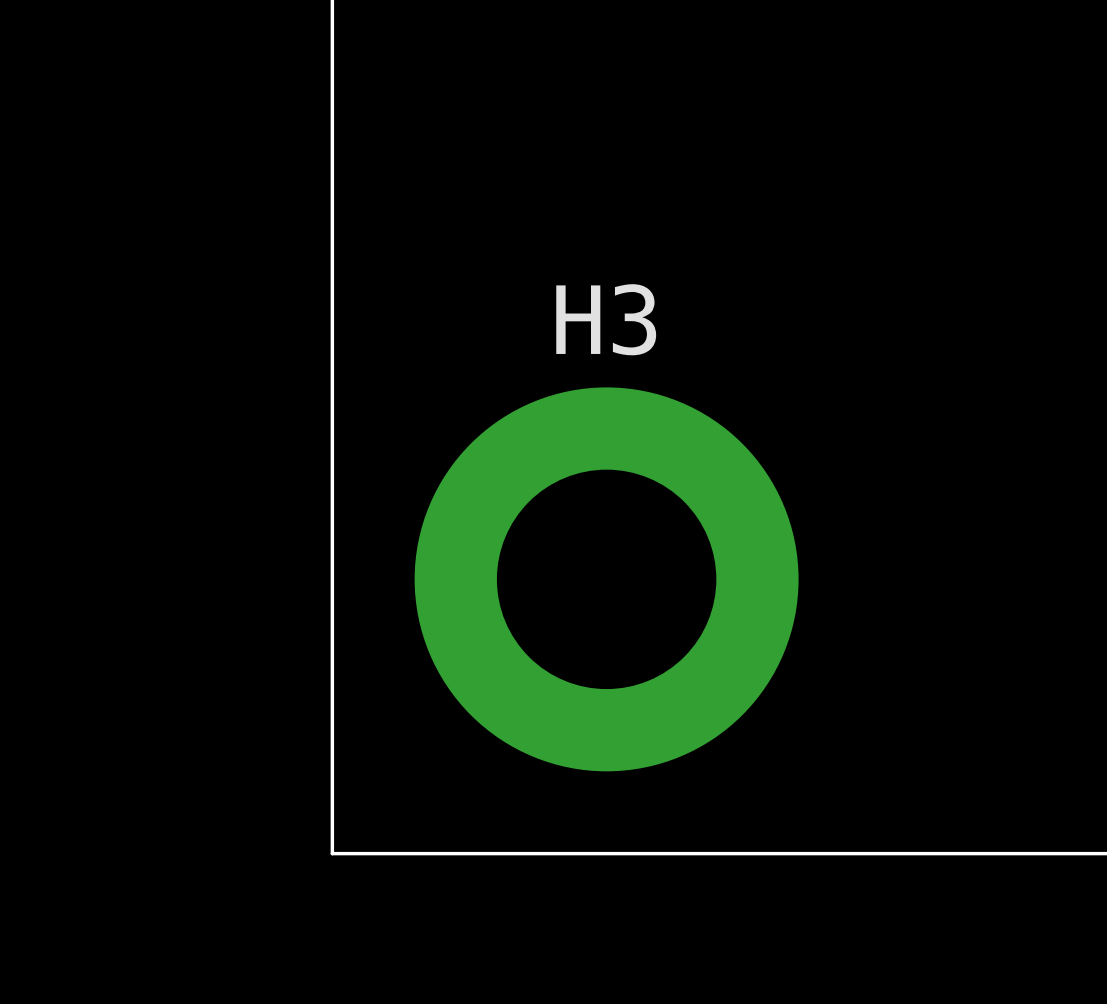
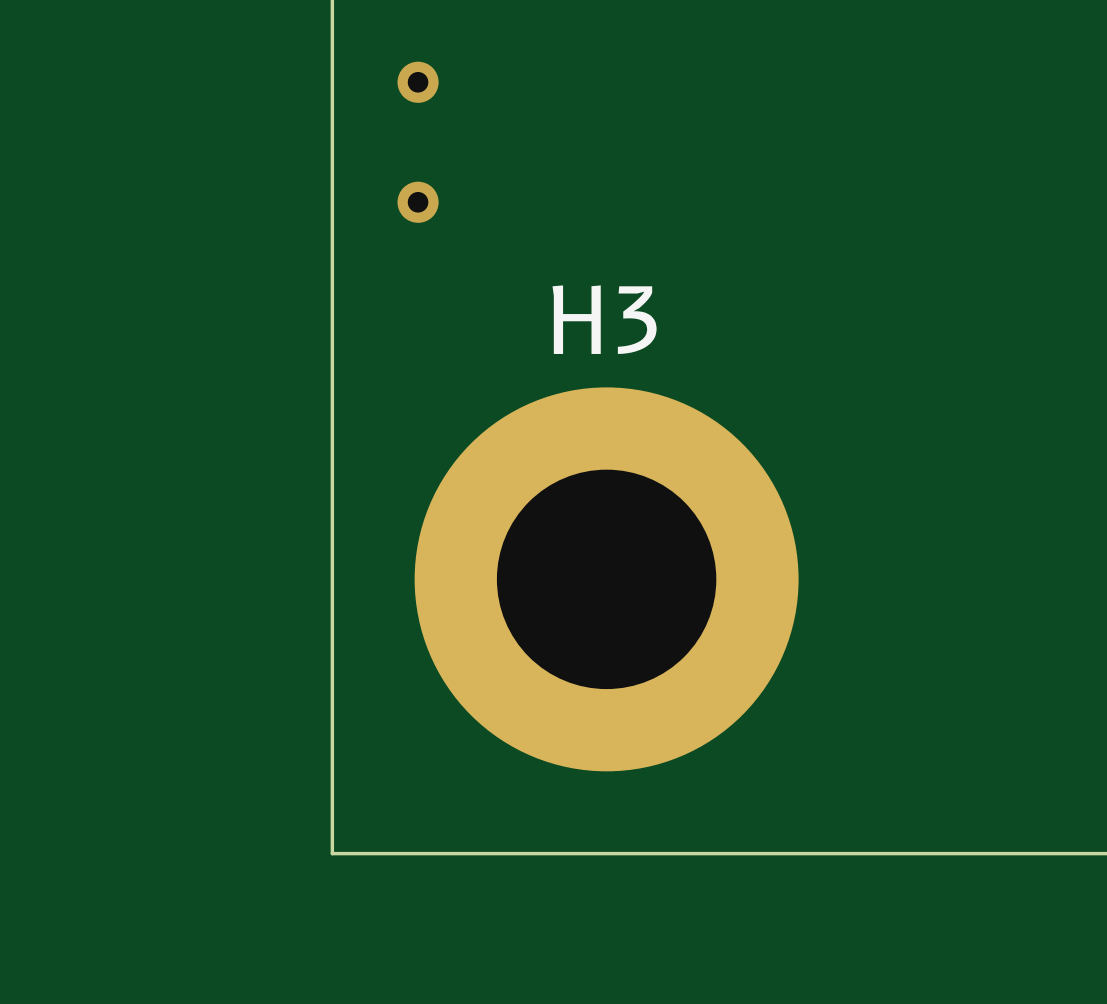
via: none -> (418, 82)
via: none -> (418, 202)

